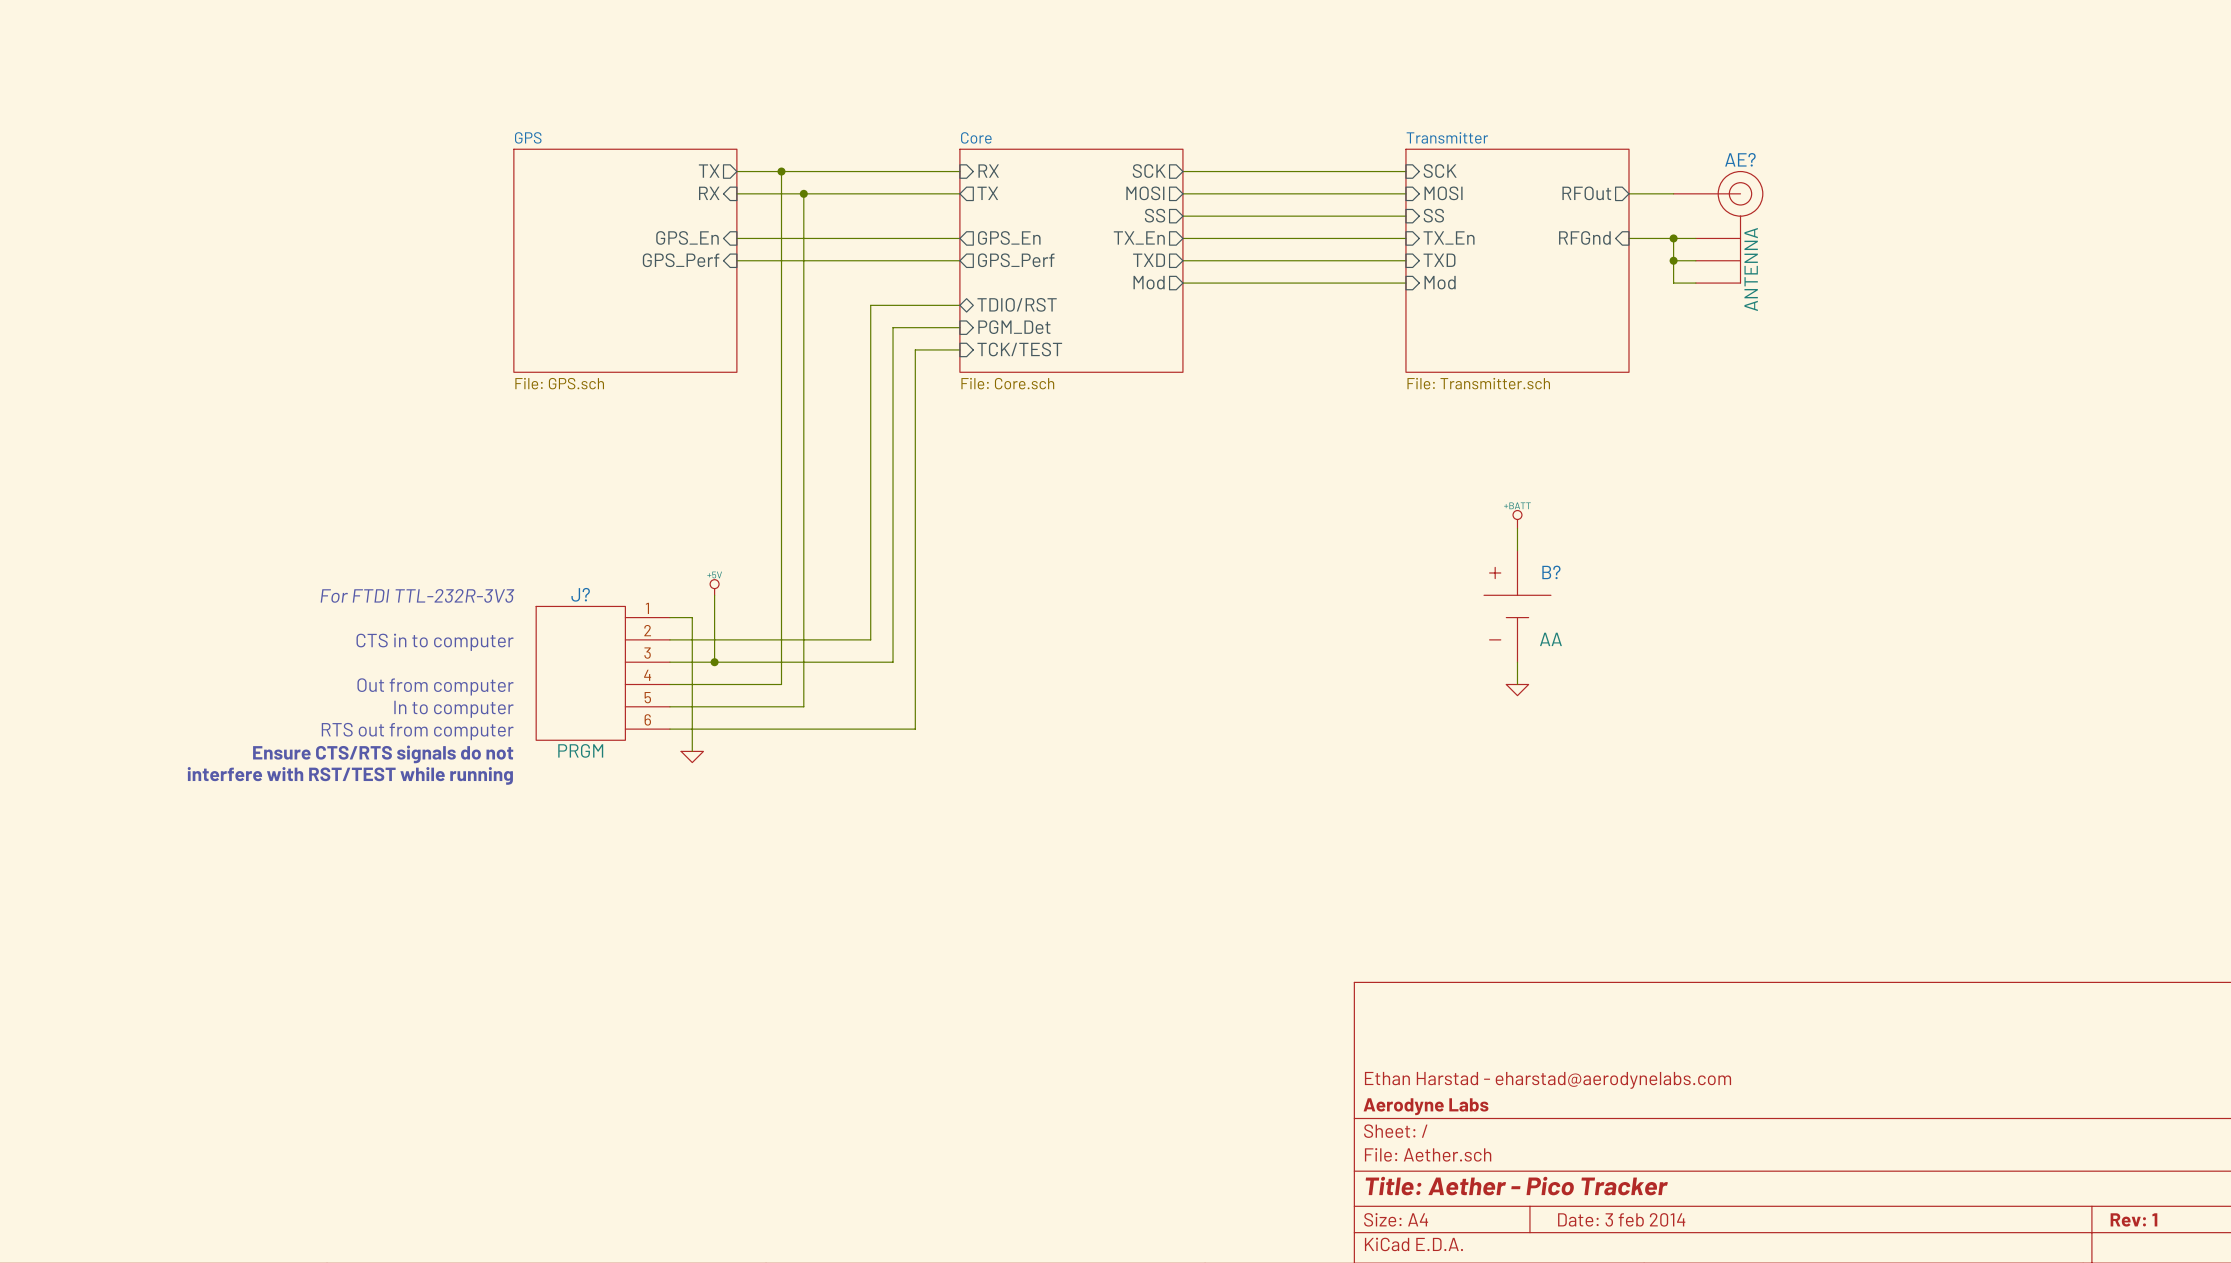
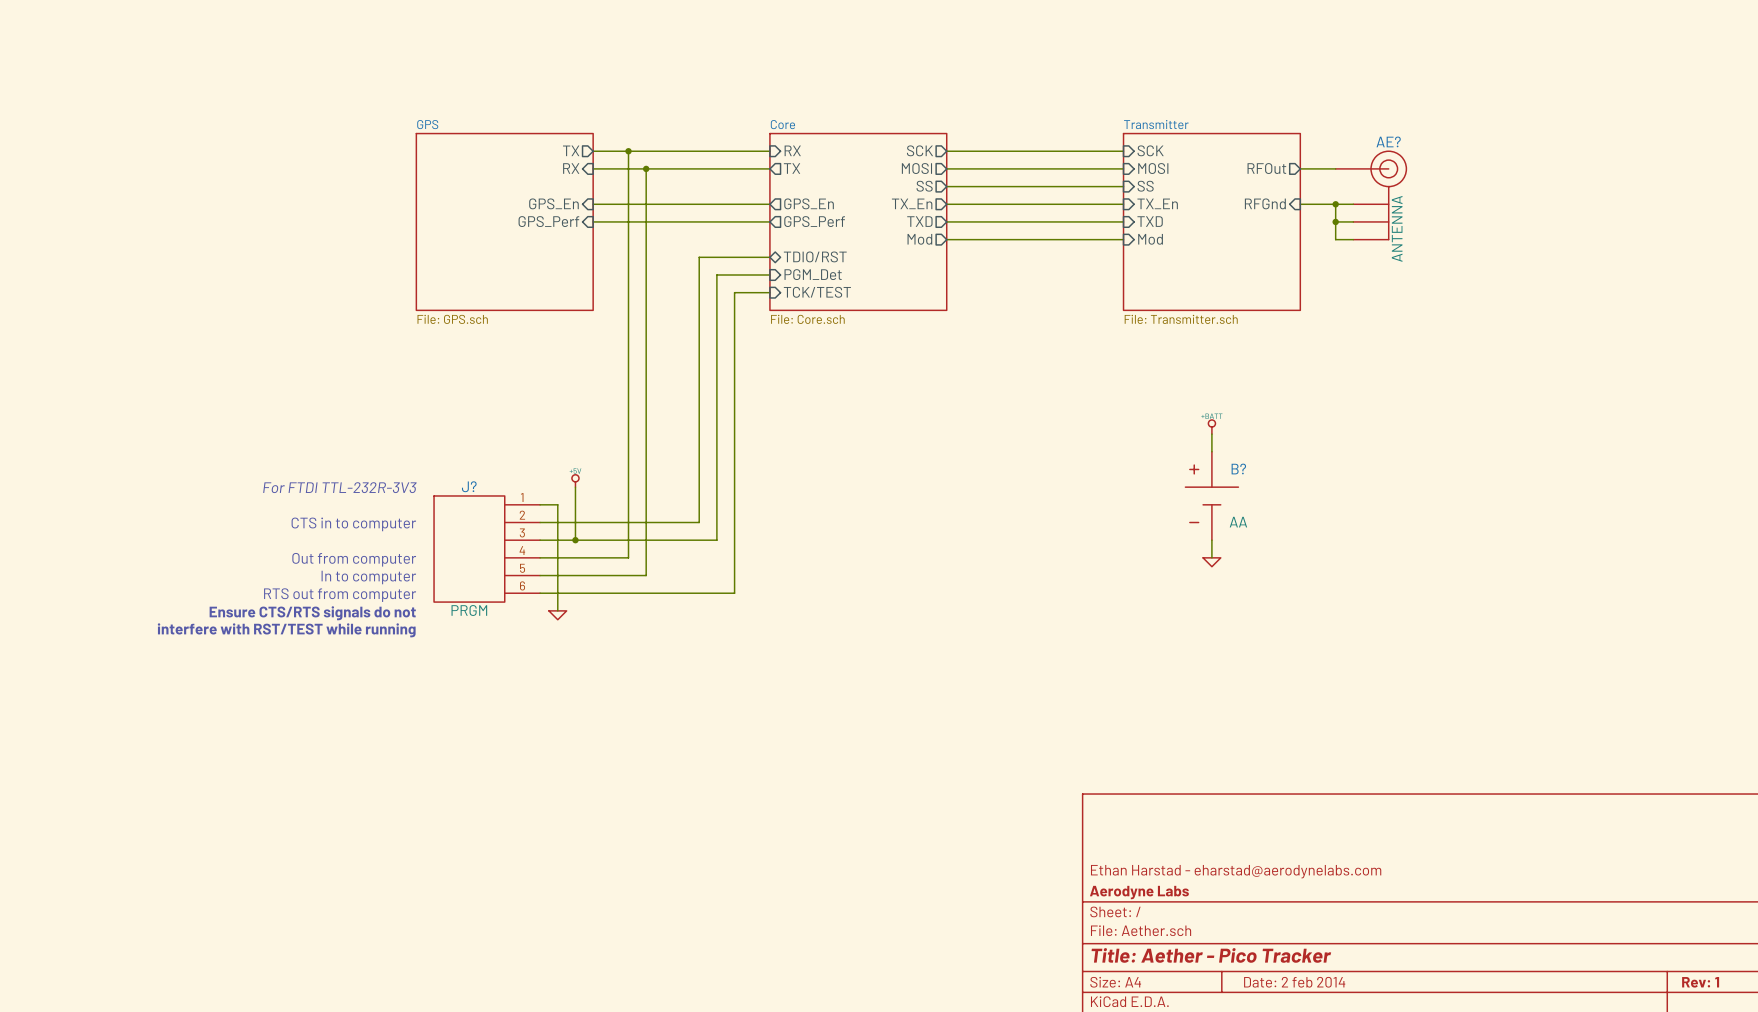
title block: Date: 3 feb 2014 (1621, 1219) -> Date: 2 feb 2014 (1294, 982)

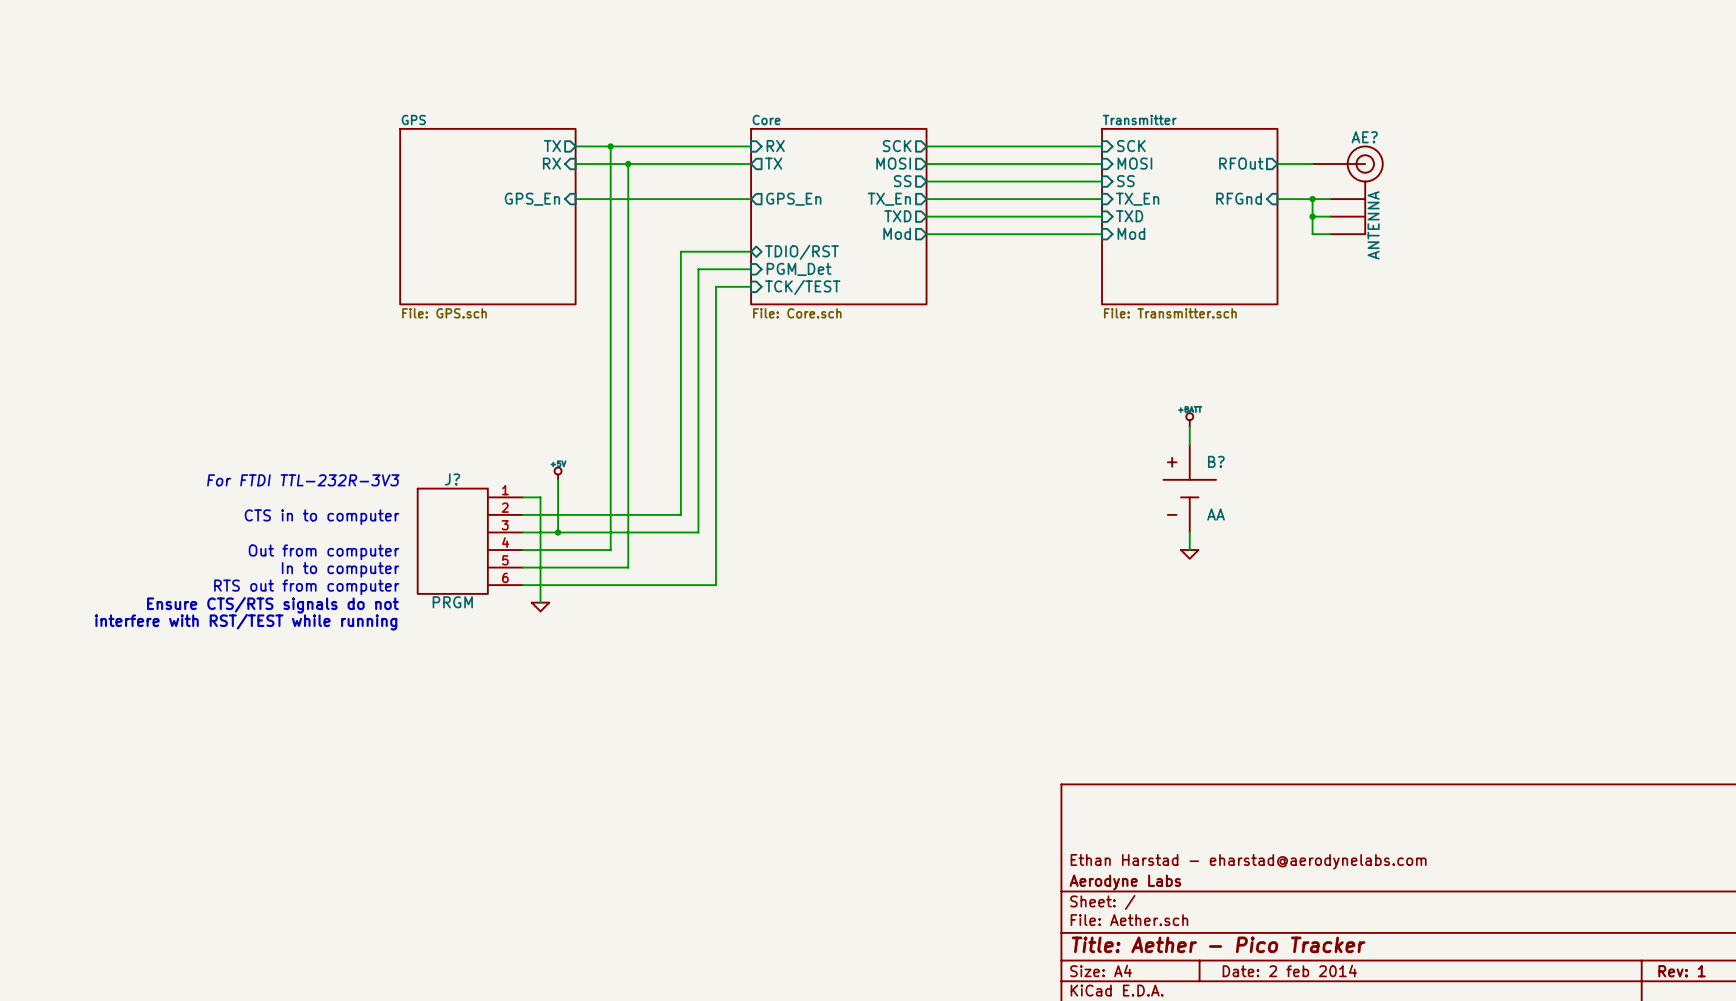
sheet pin: GPS_Perf (548, 221) -> none
wire: (593, 221) (769, 221) -> none
sheet pin: GPS_Perf (814, 221) -> none

